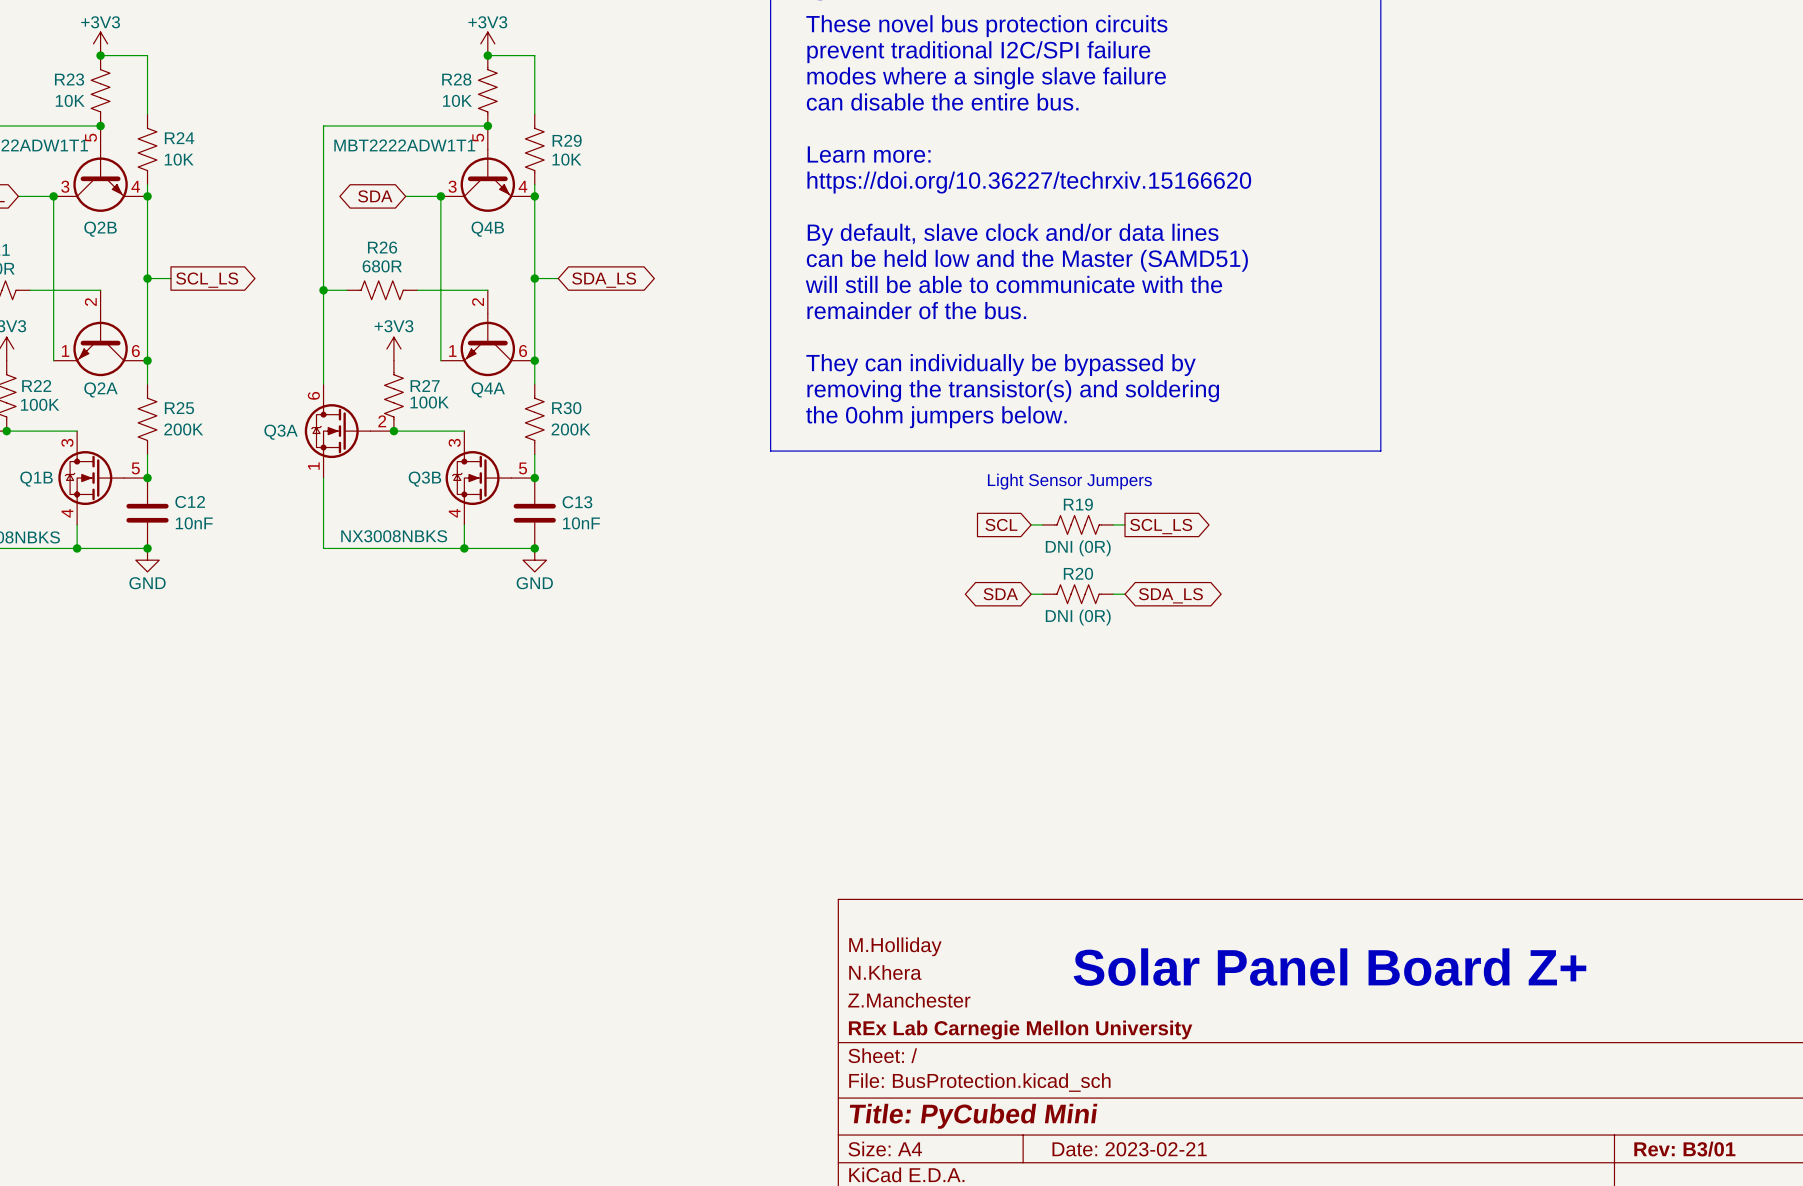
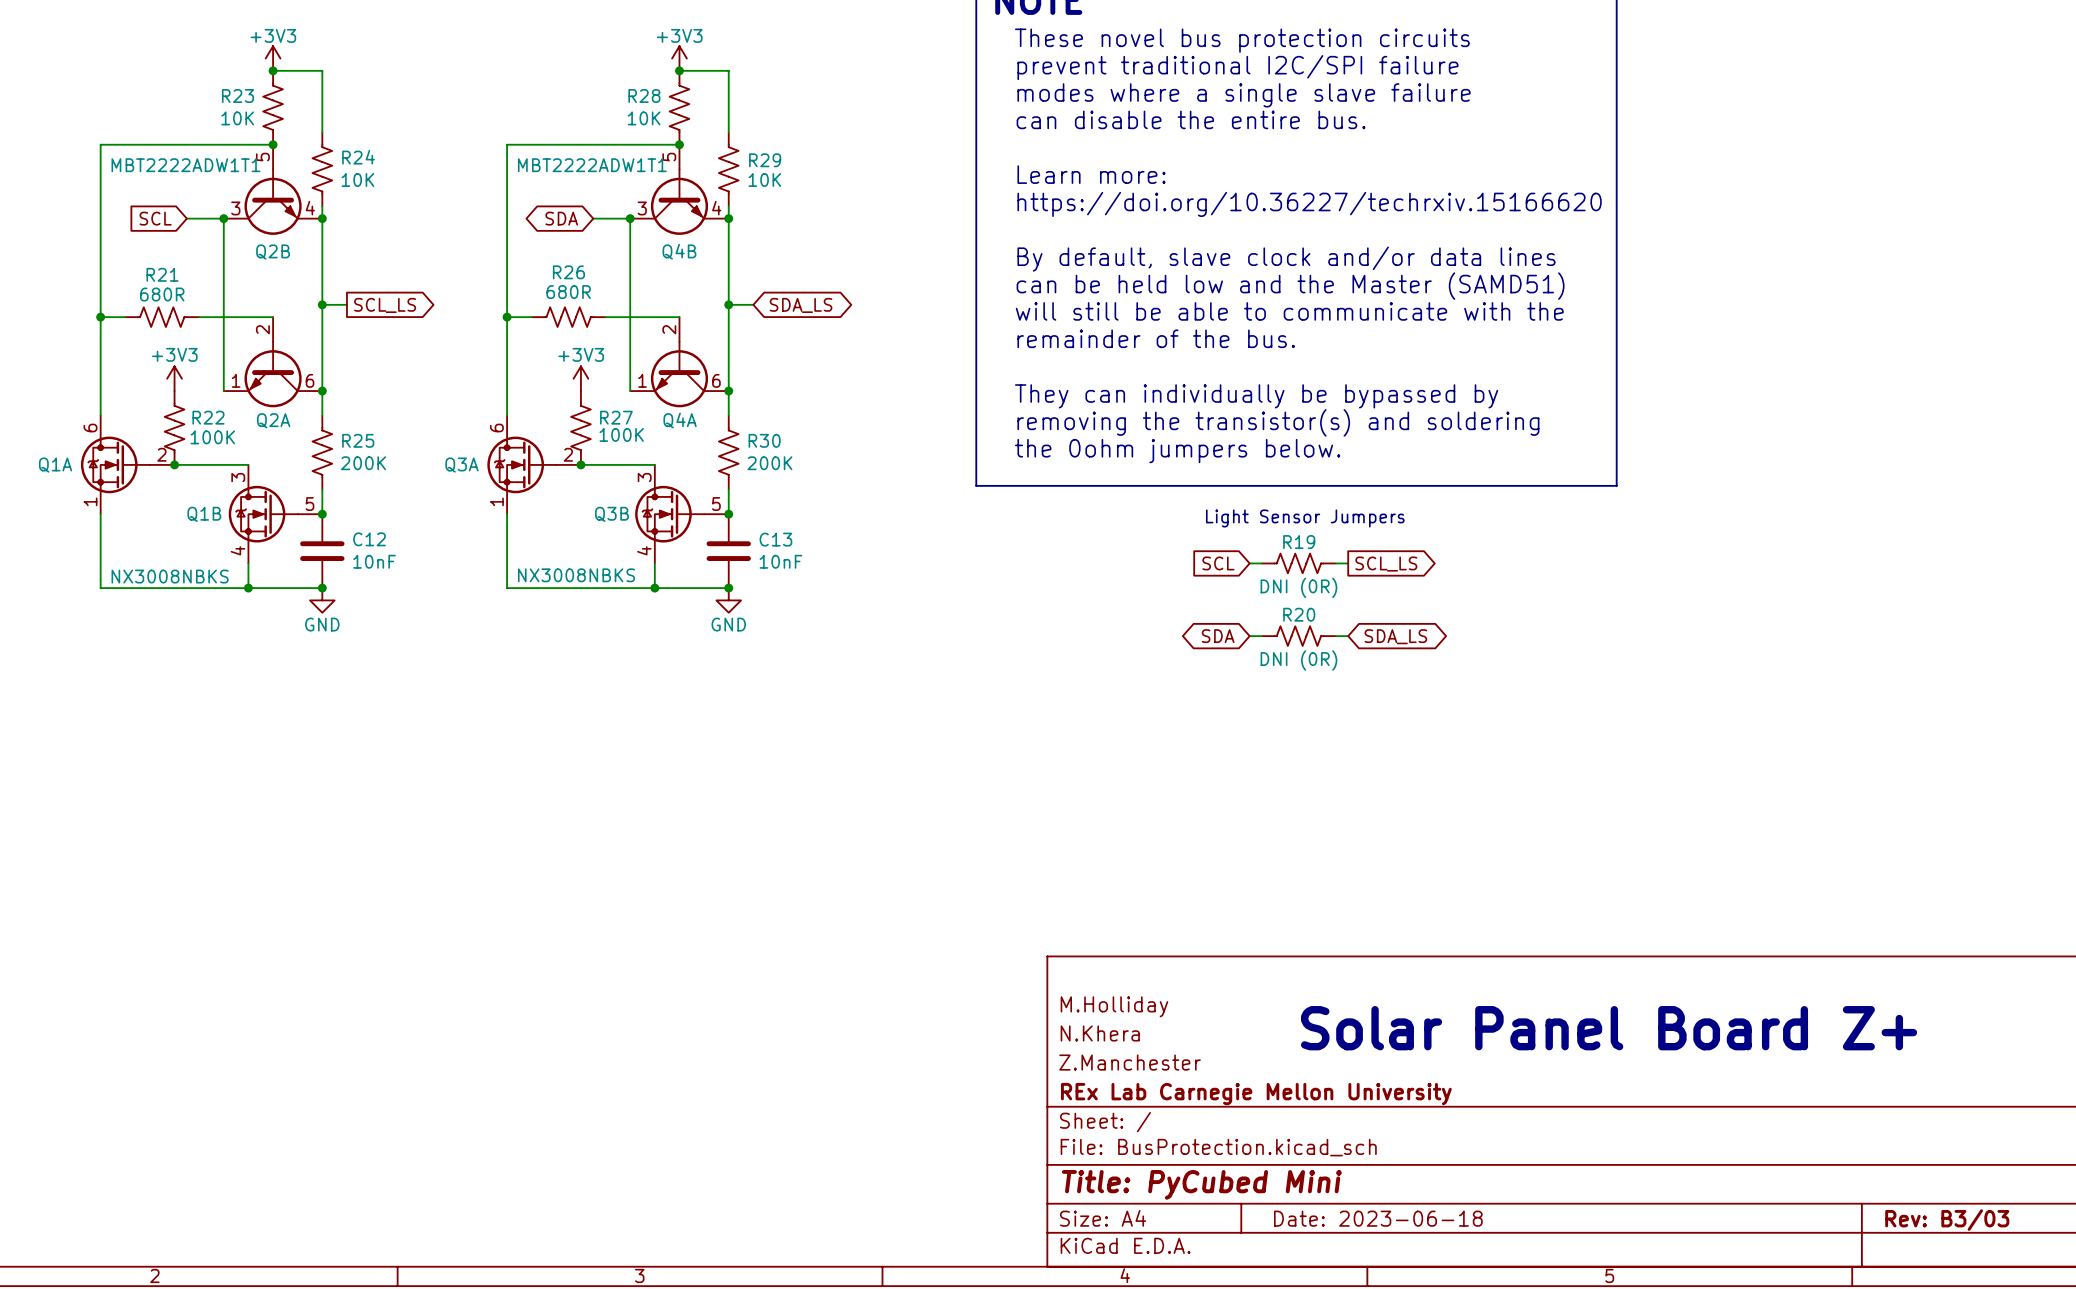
title block: Date: 2023-02-21 (1129, 1149) -> Date: 2023-06-18 (1378, 1218)
title block: Rev: B3/01 (1684, 1149) -> Rev: B3/03 (1947, 1220)

